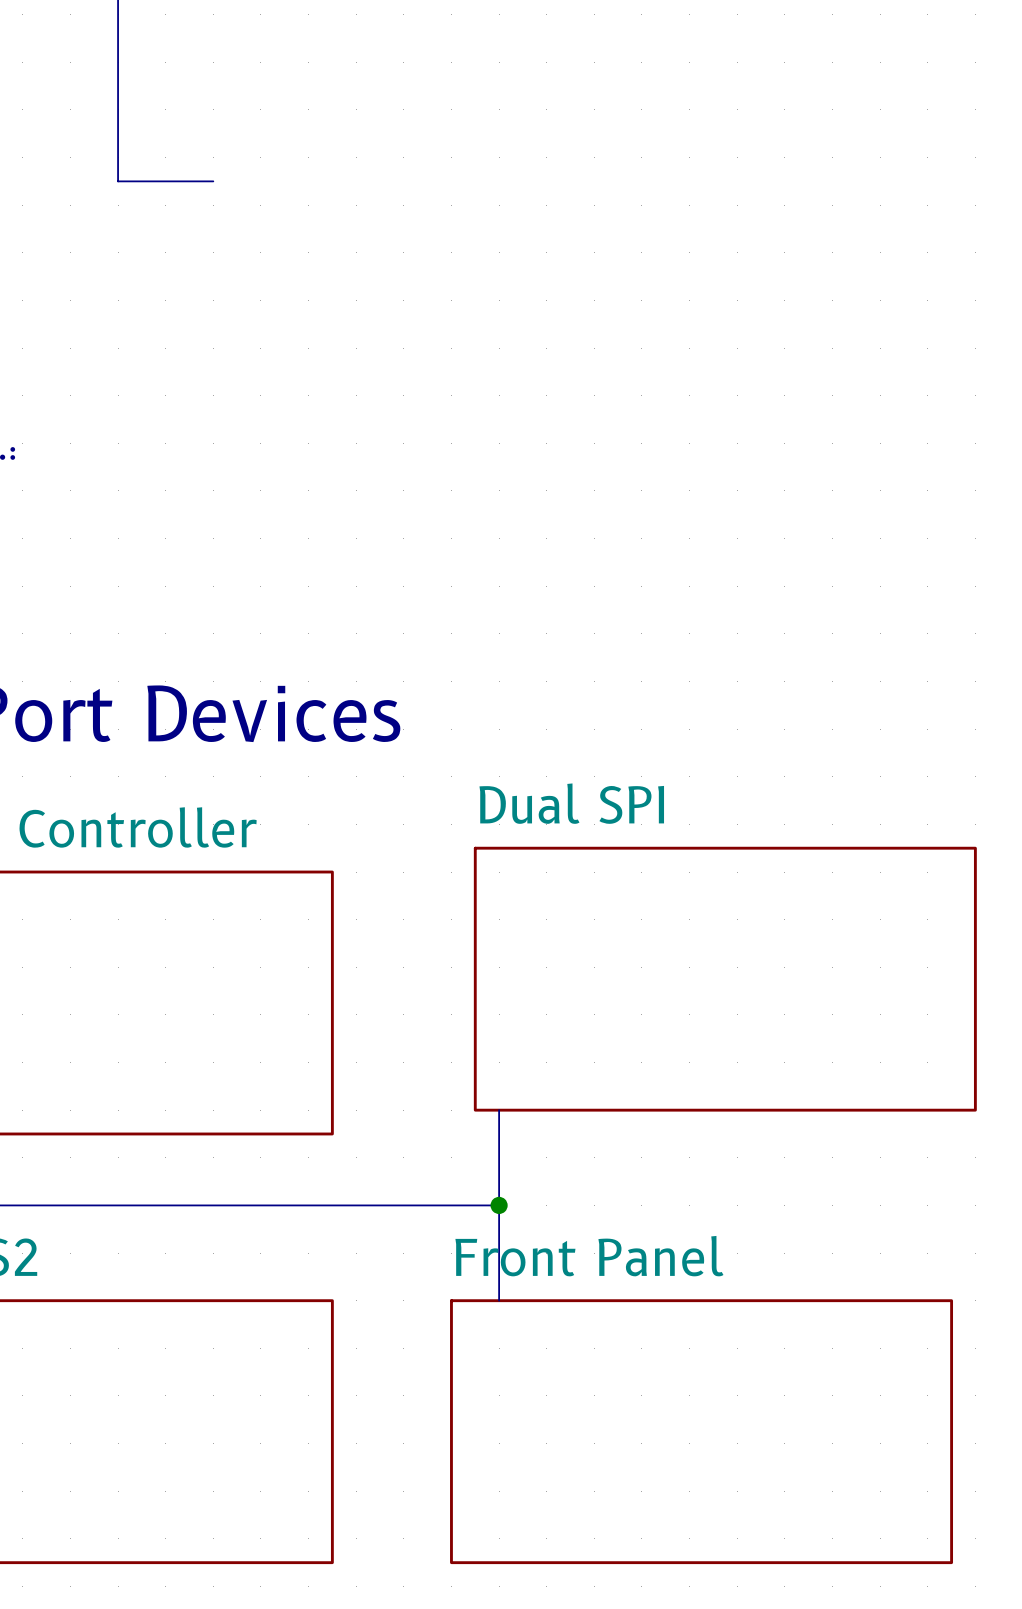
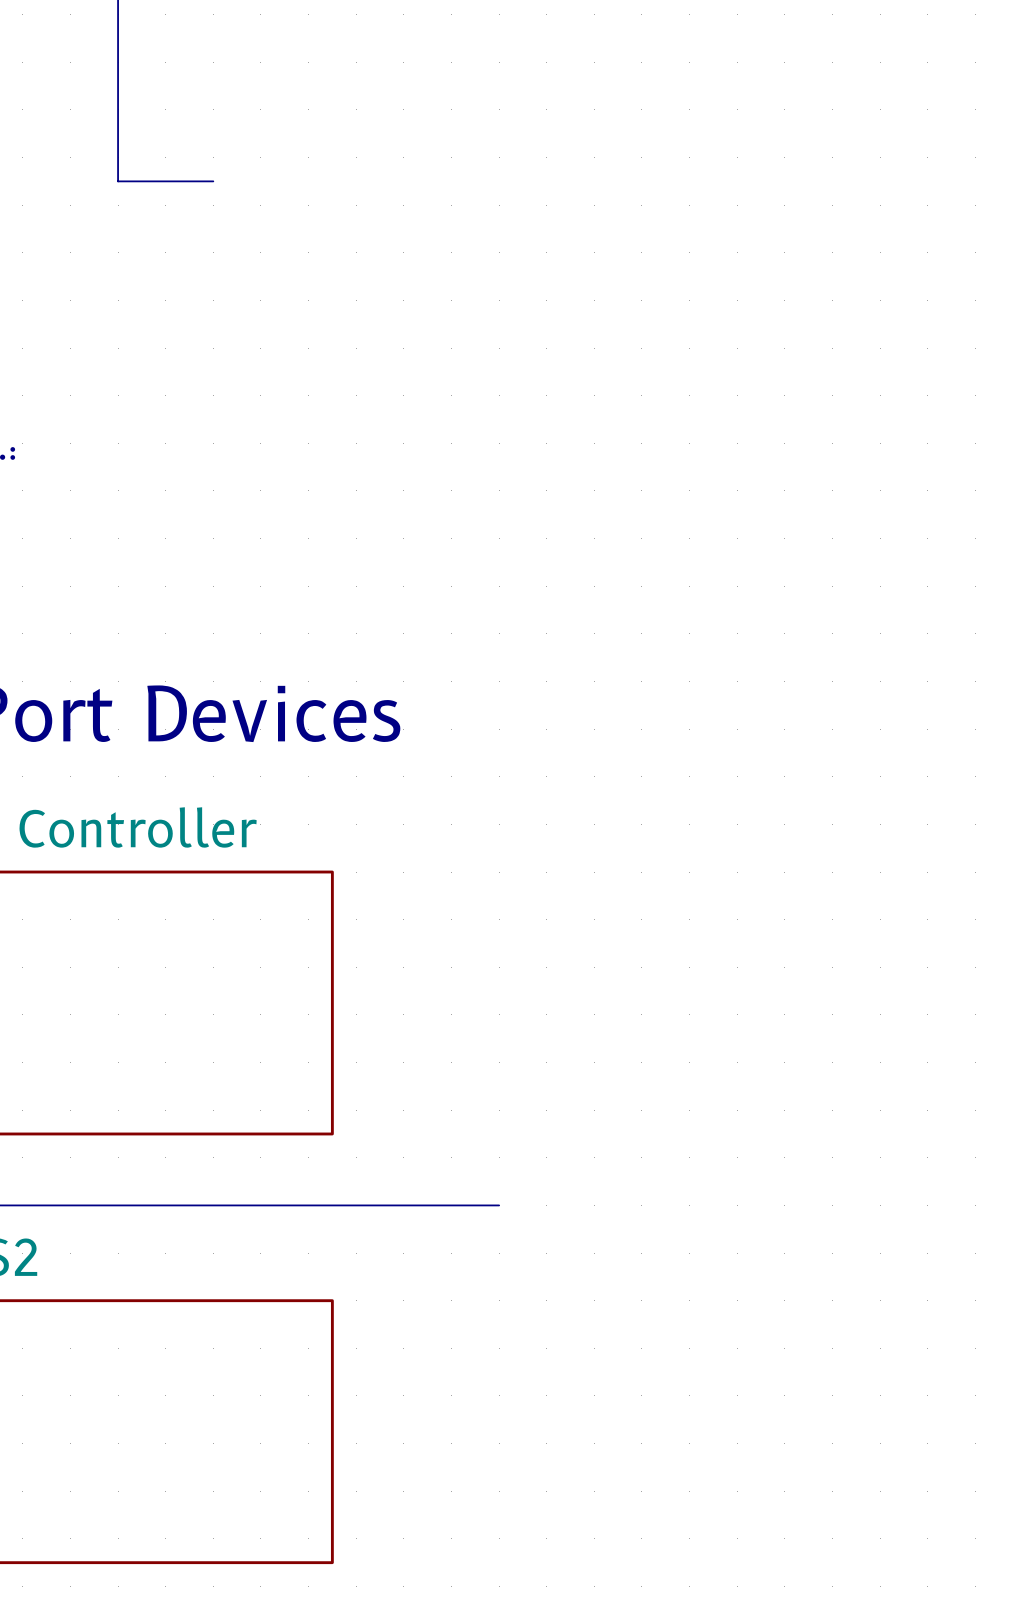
sheet Dual SPI: (725, 979) -> none
bus: (499, 1110) (499, 1300) -> none
junction: (499, 1205) -> none
sheet Front Panel: (701, 1431) -> none

